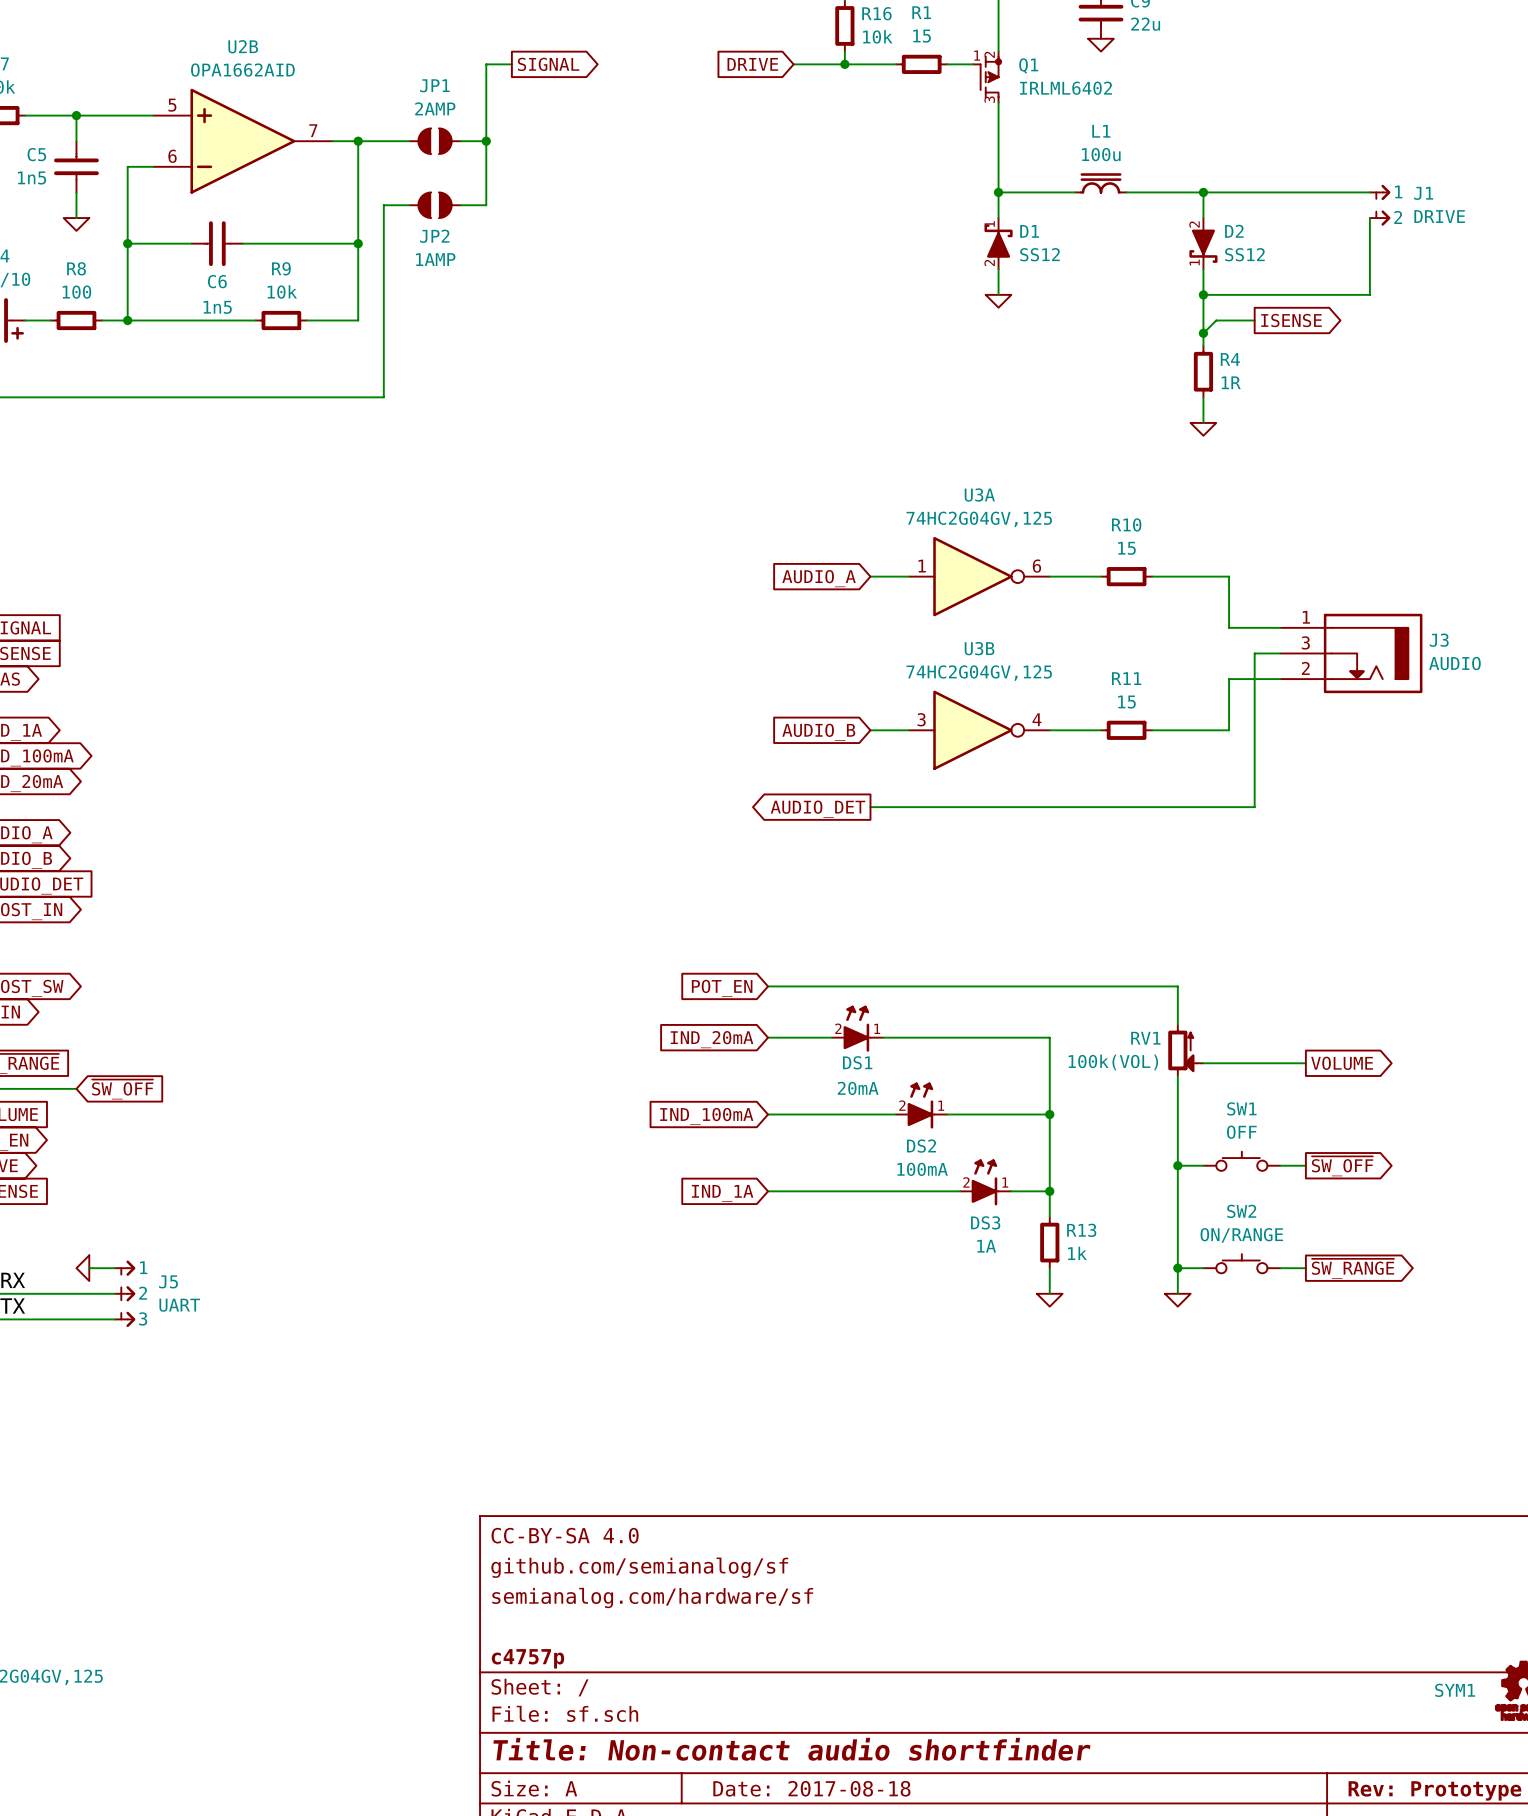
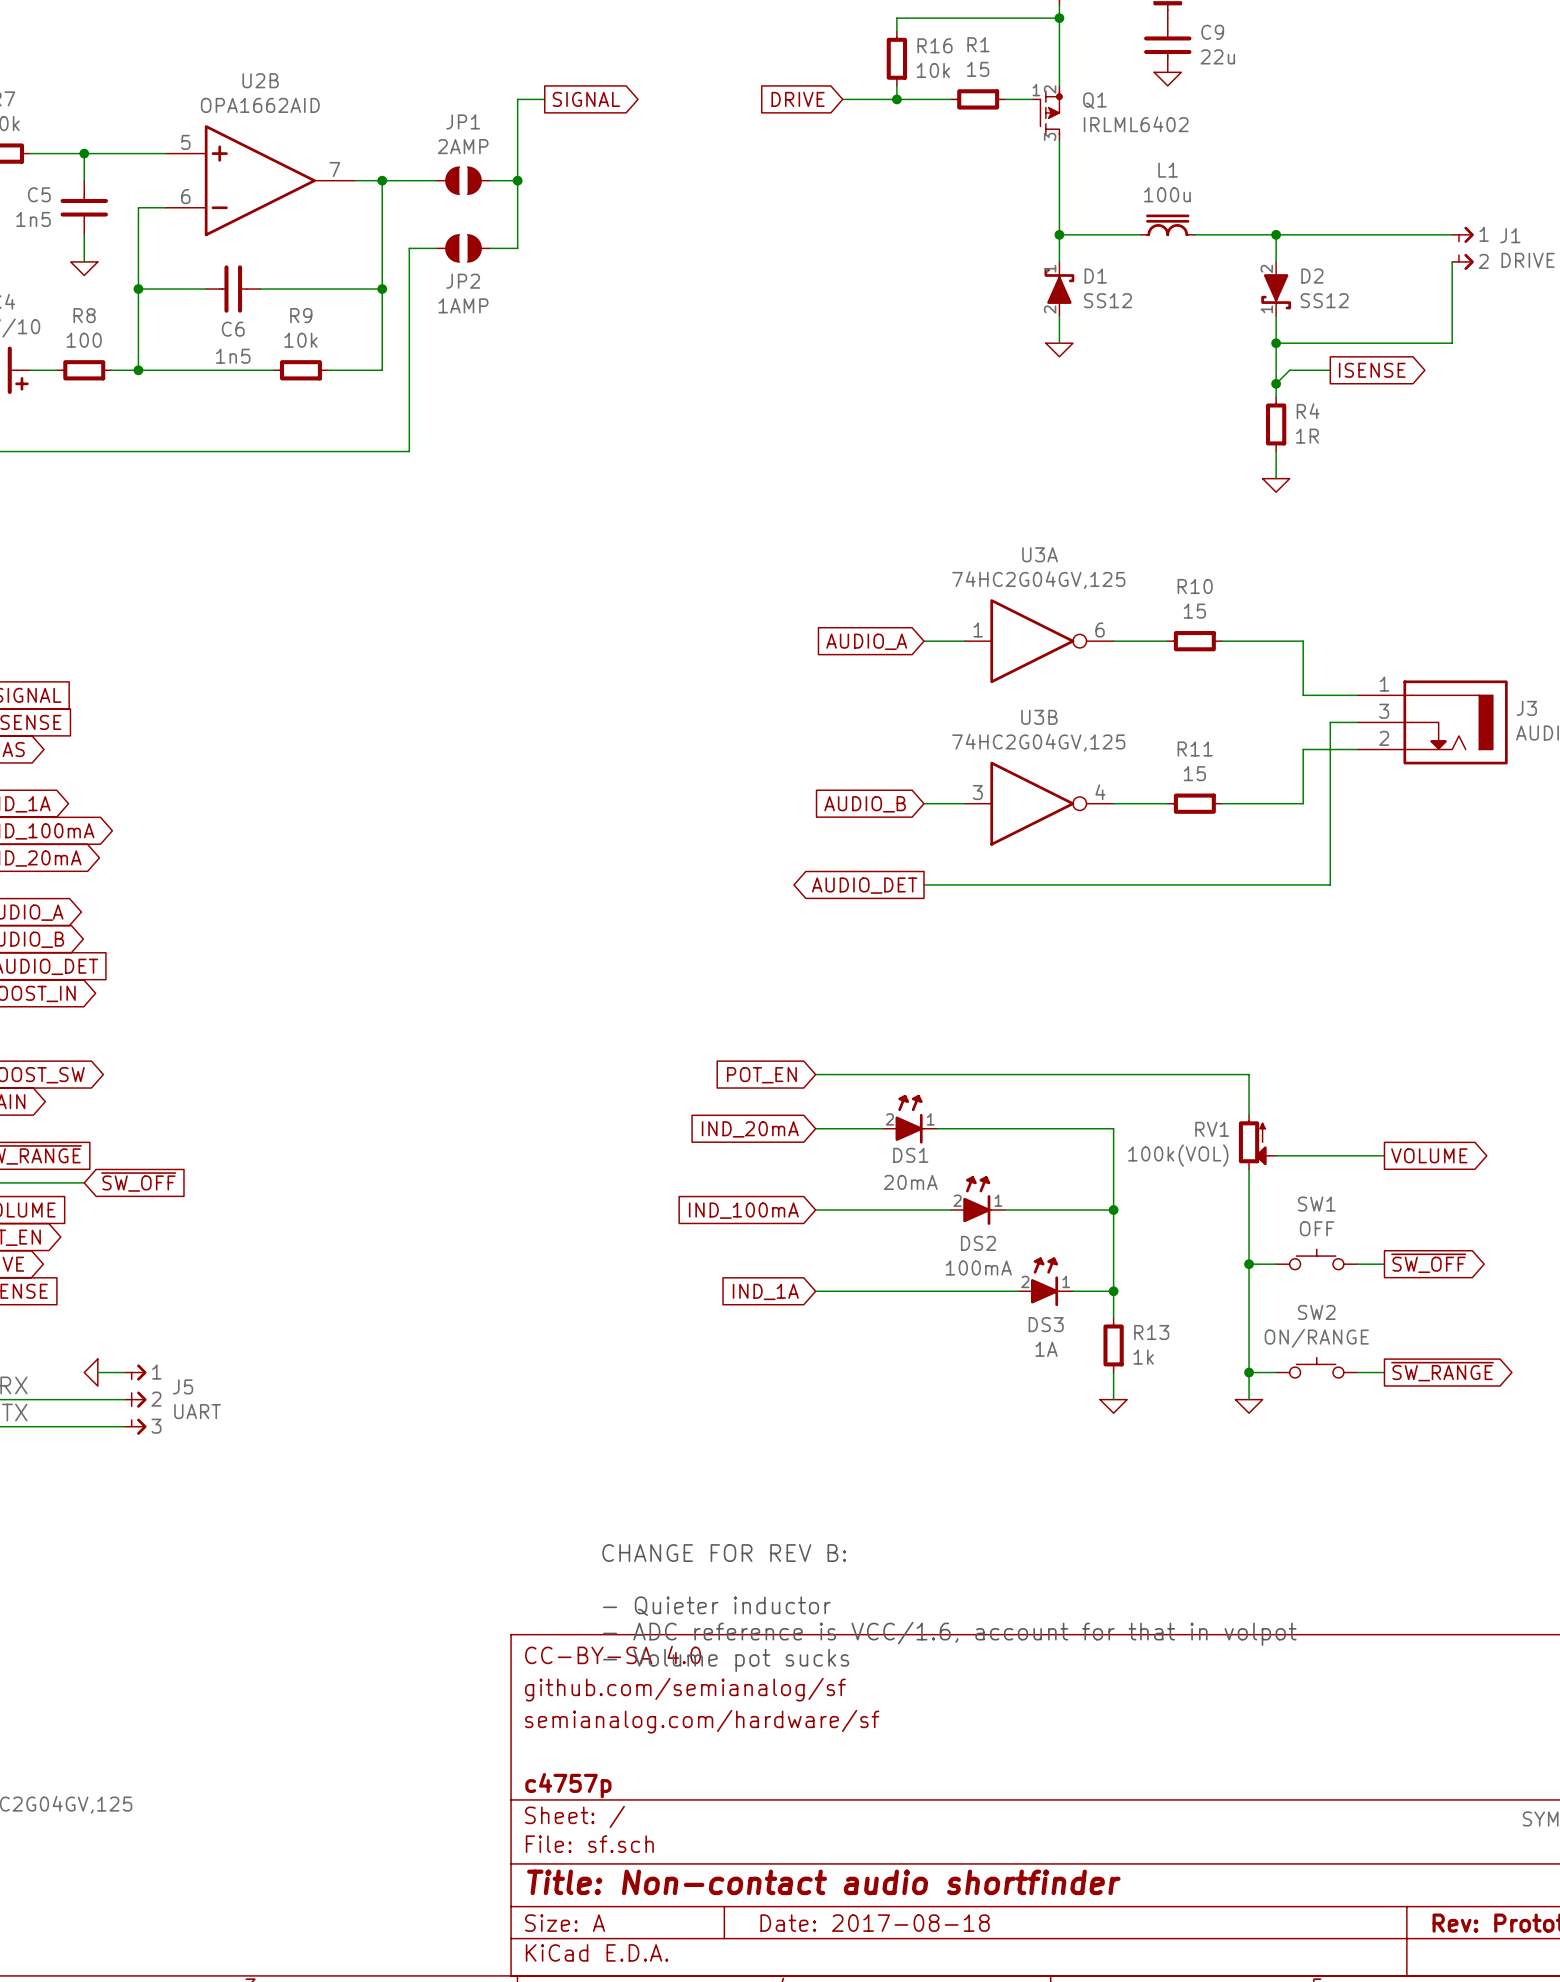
text: none -> CHANGE FOR REV B: (724, 1553)
text: none -> - Quieter inductor (716, 1606)
text: none -> - ADC reference is VCC/1.6, account for that in volpot (949, 1633)
text: none -> - Volume pot sucks (726, 1660)

